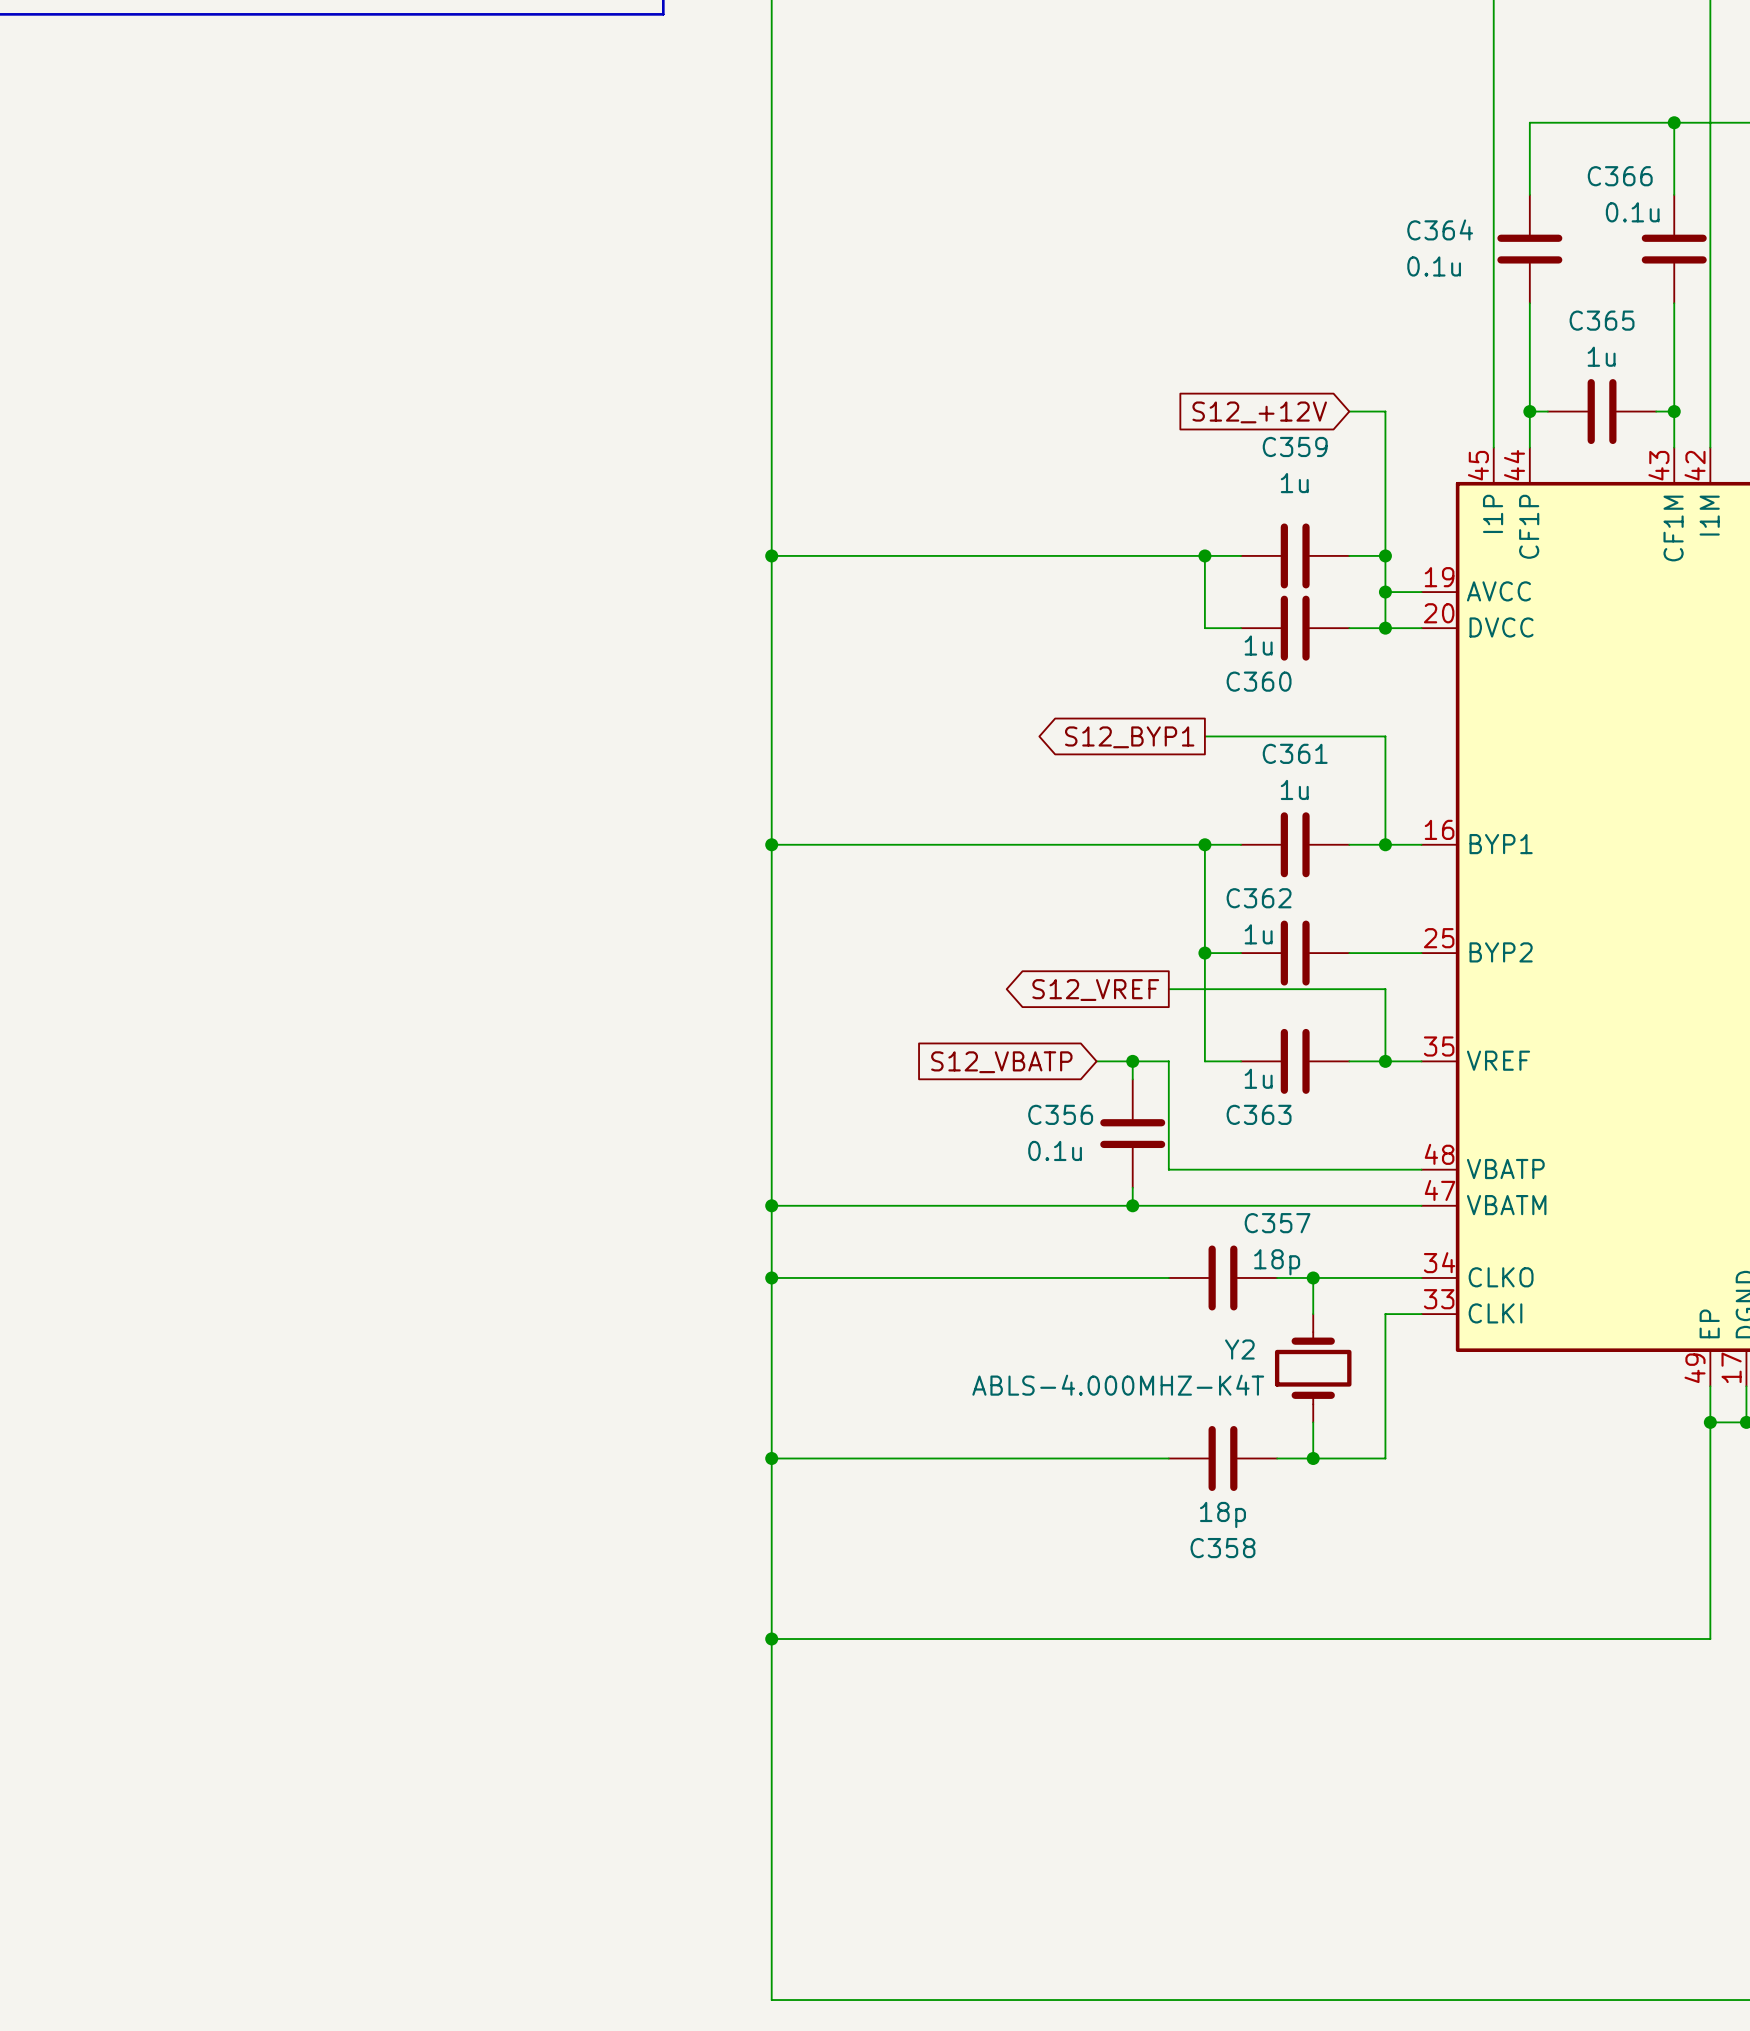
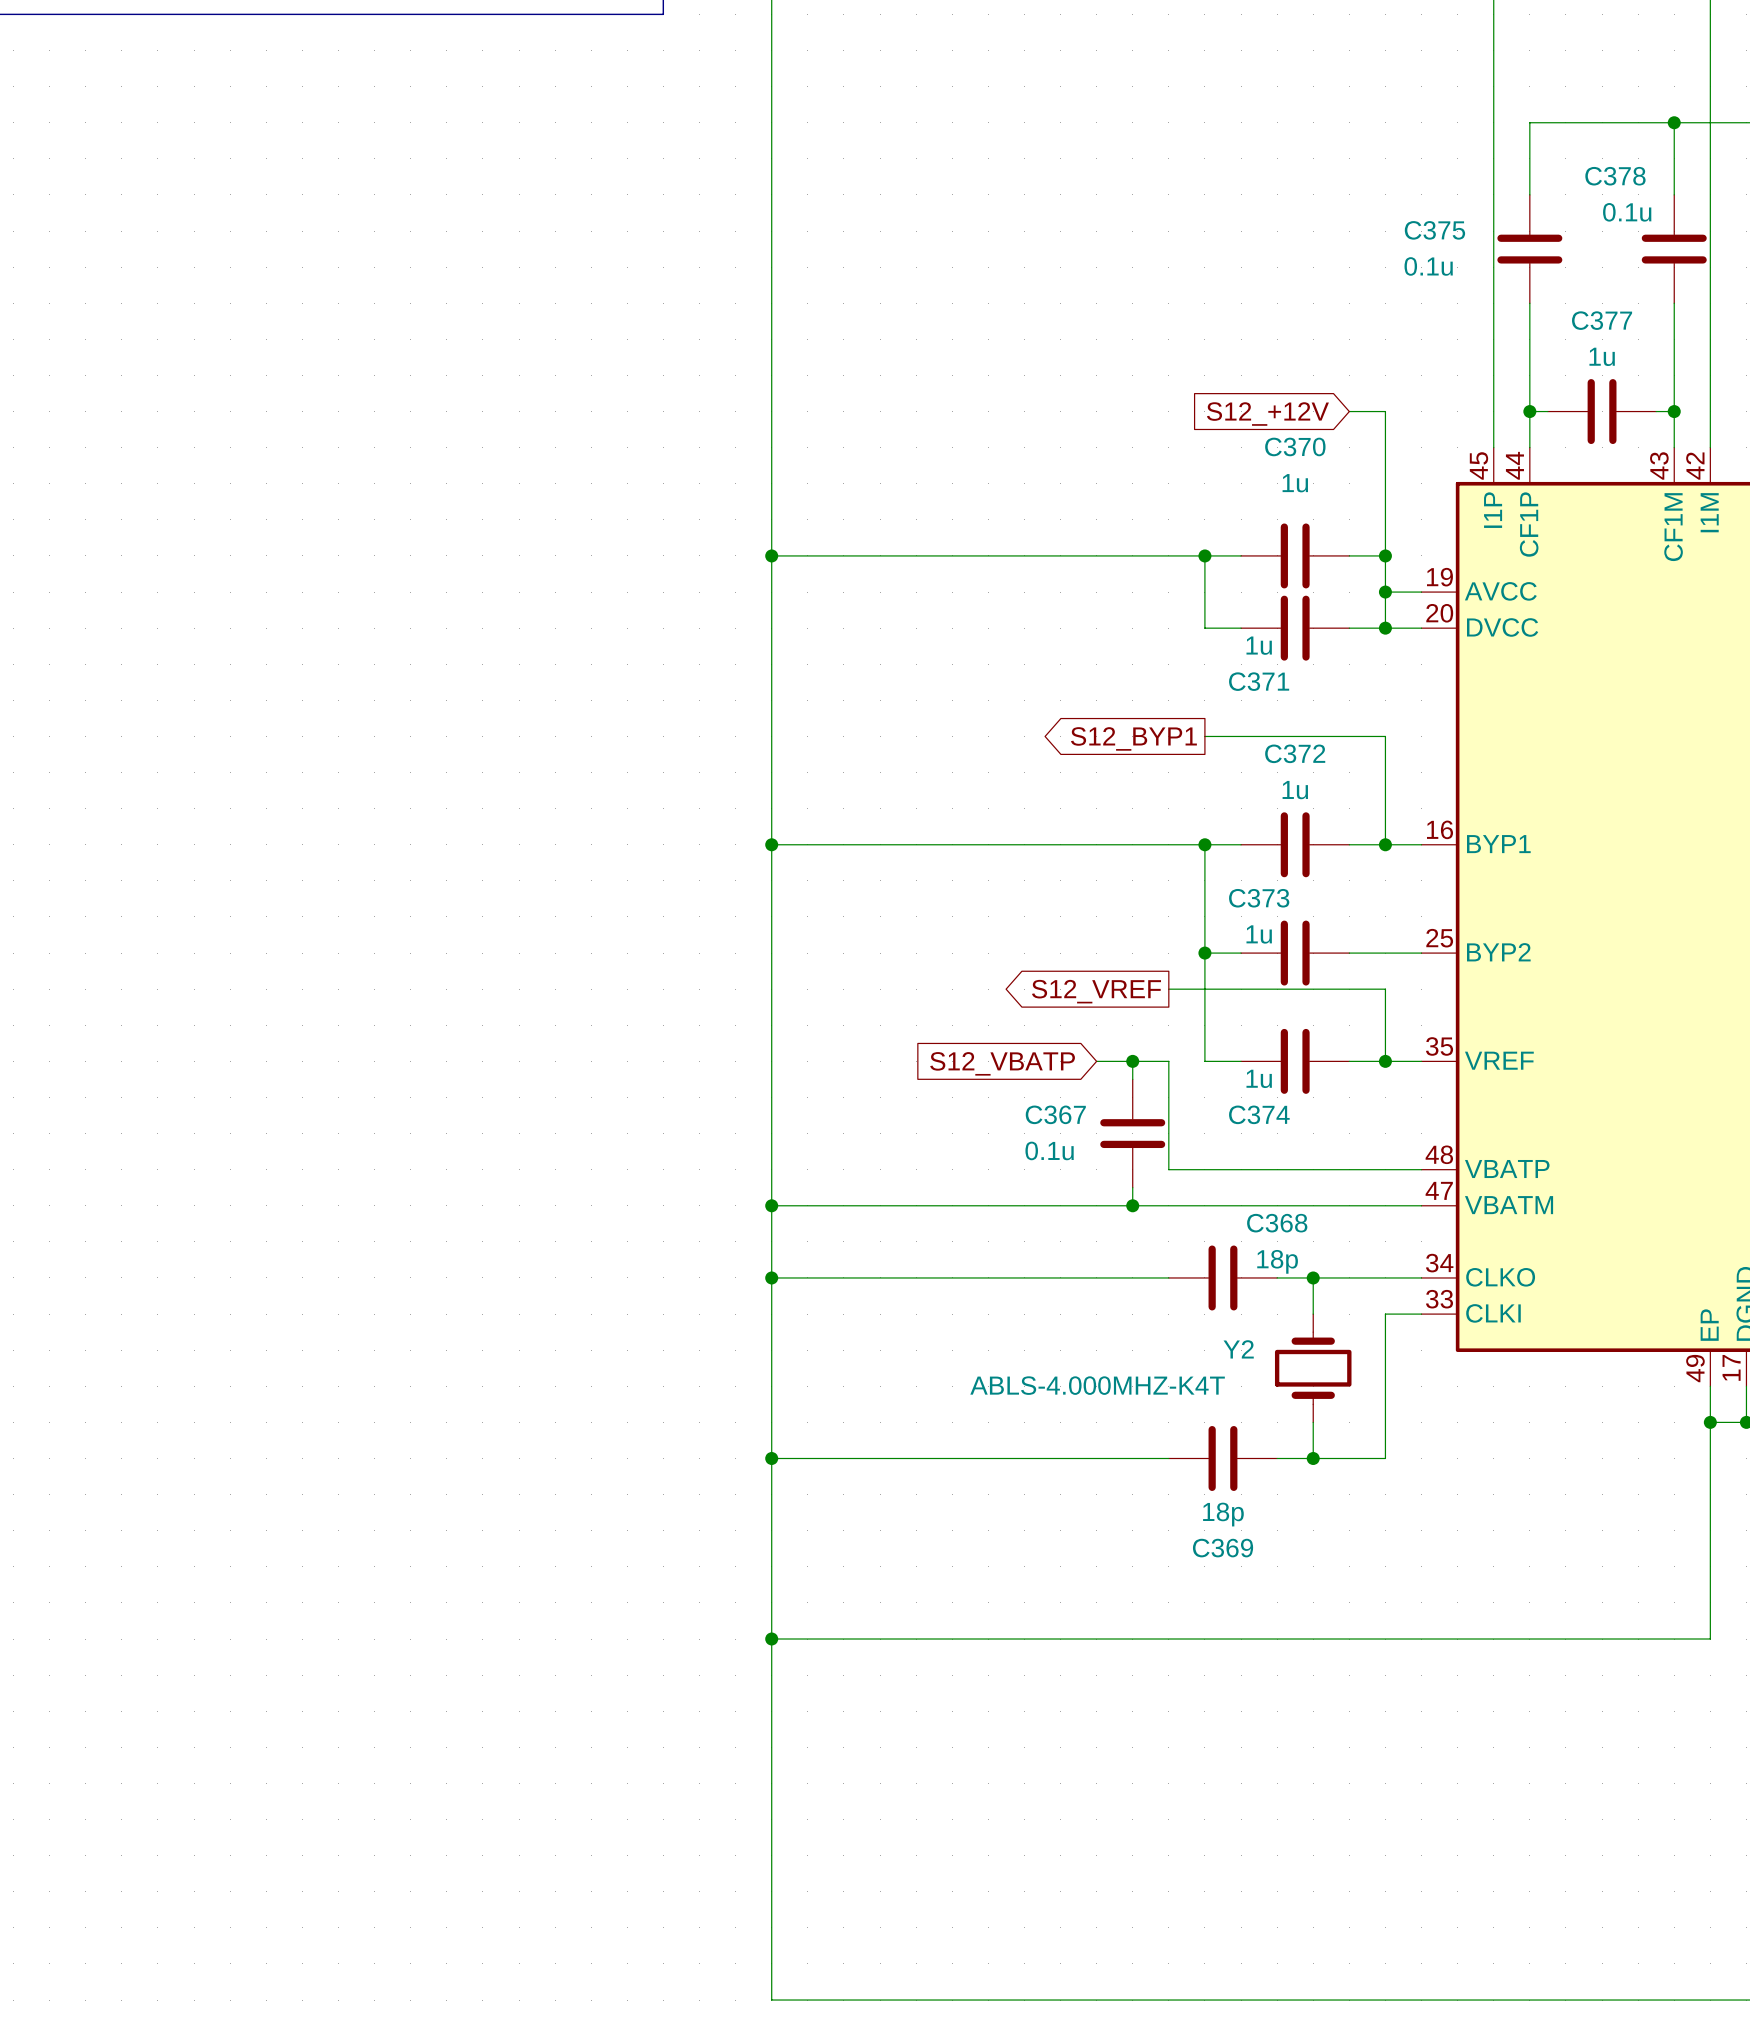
C366 name: C366 (1620, 176) -> C378 (1615, 176)
C364 name: C364 (1440, 229) -> C375 (1434, 230)
C365 name: C365 (1602, 320) -> C377 (1602, 320)
C359 name: C359 (1295, 446) -> C370 (1295, 446)
C360 name: C360 (1259, 681) -> C371 (1259, 681)
C361 name: C361 (1295, 753) -> C372 (1295, 753)
C362 name: C362 (1259, 898) -> C373 (1259, 898)
C356 name: C356 (1060, 1114) -> C367 (1055, 1114)
C363 name: C363 (1259, 1114) -> C374 (1259, 1114)
C357 name: C357 (1277, 1223) -> C368 (1277, 1223)
C358 name: C358 (1222, 1548) -> C369 (1223, 1548)

